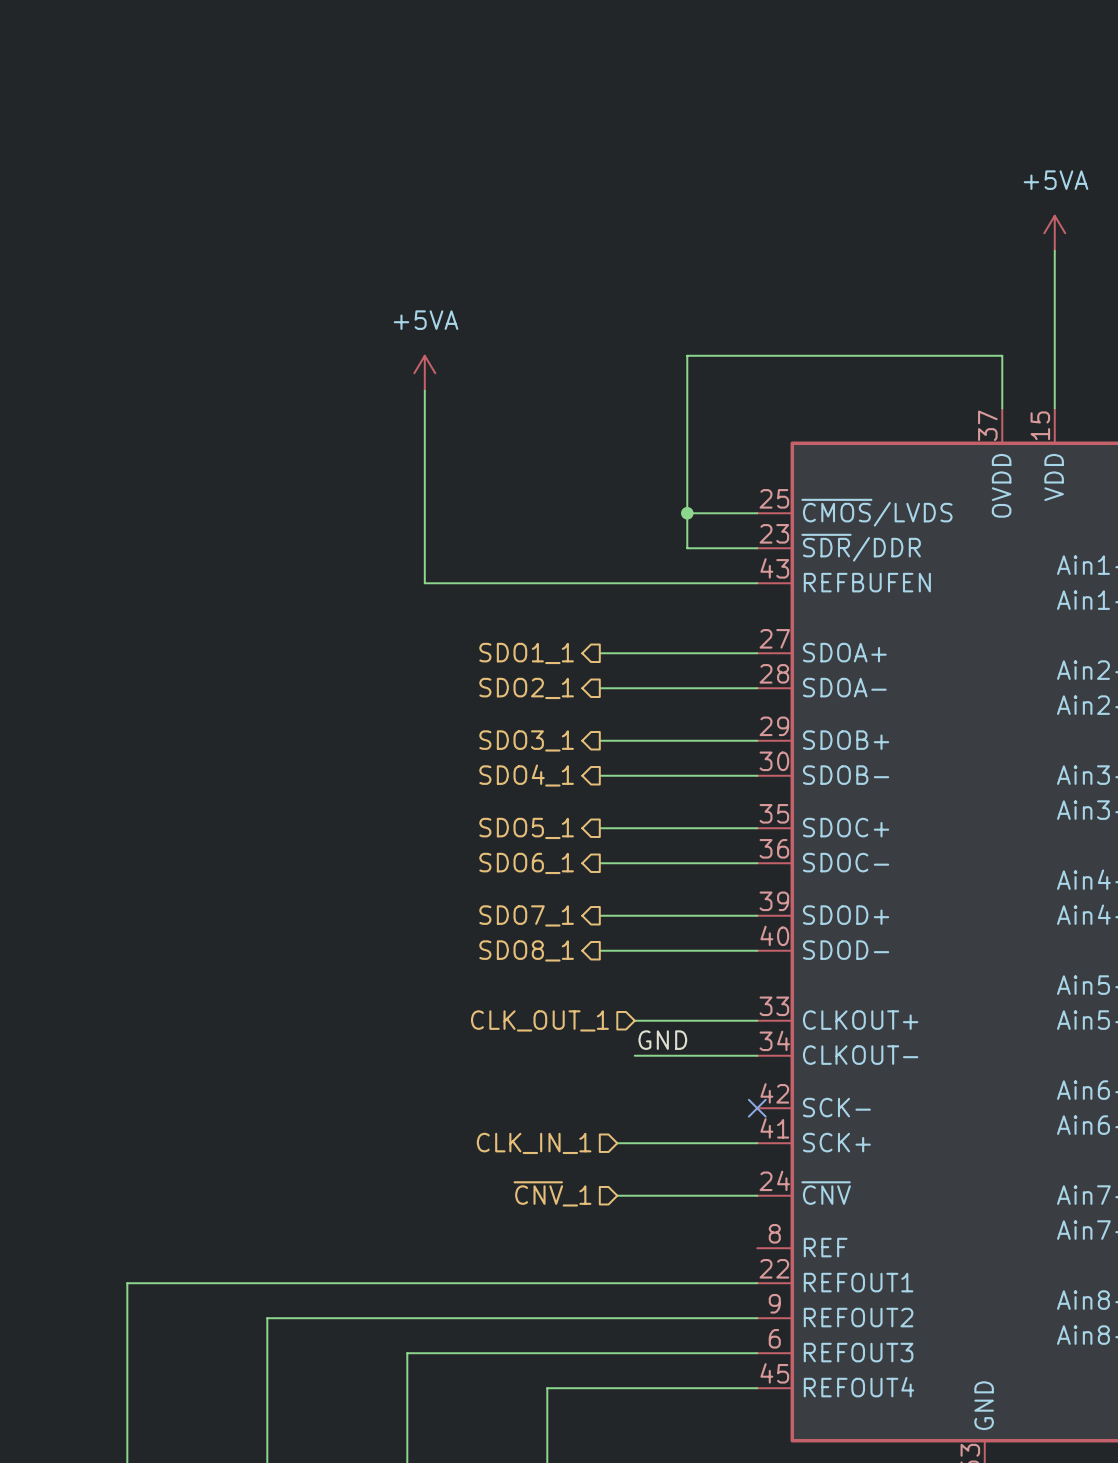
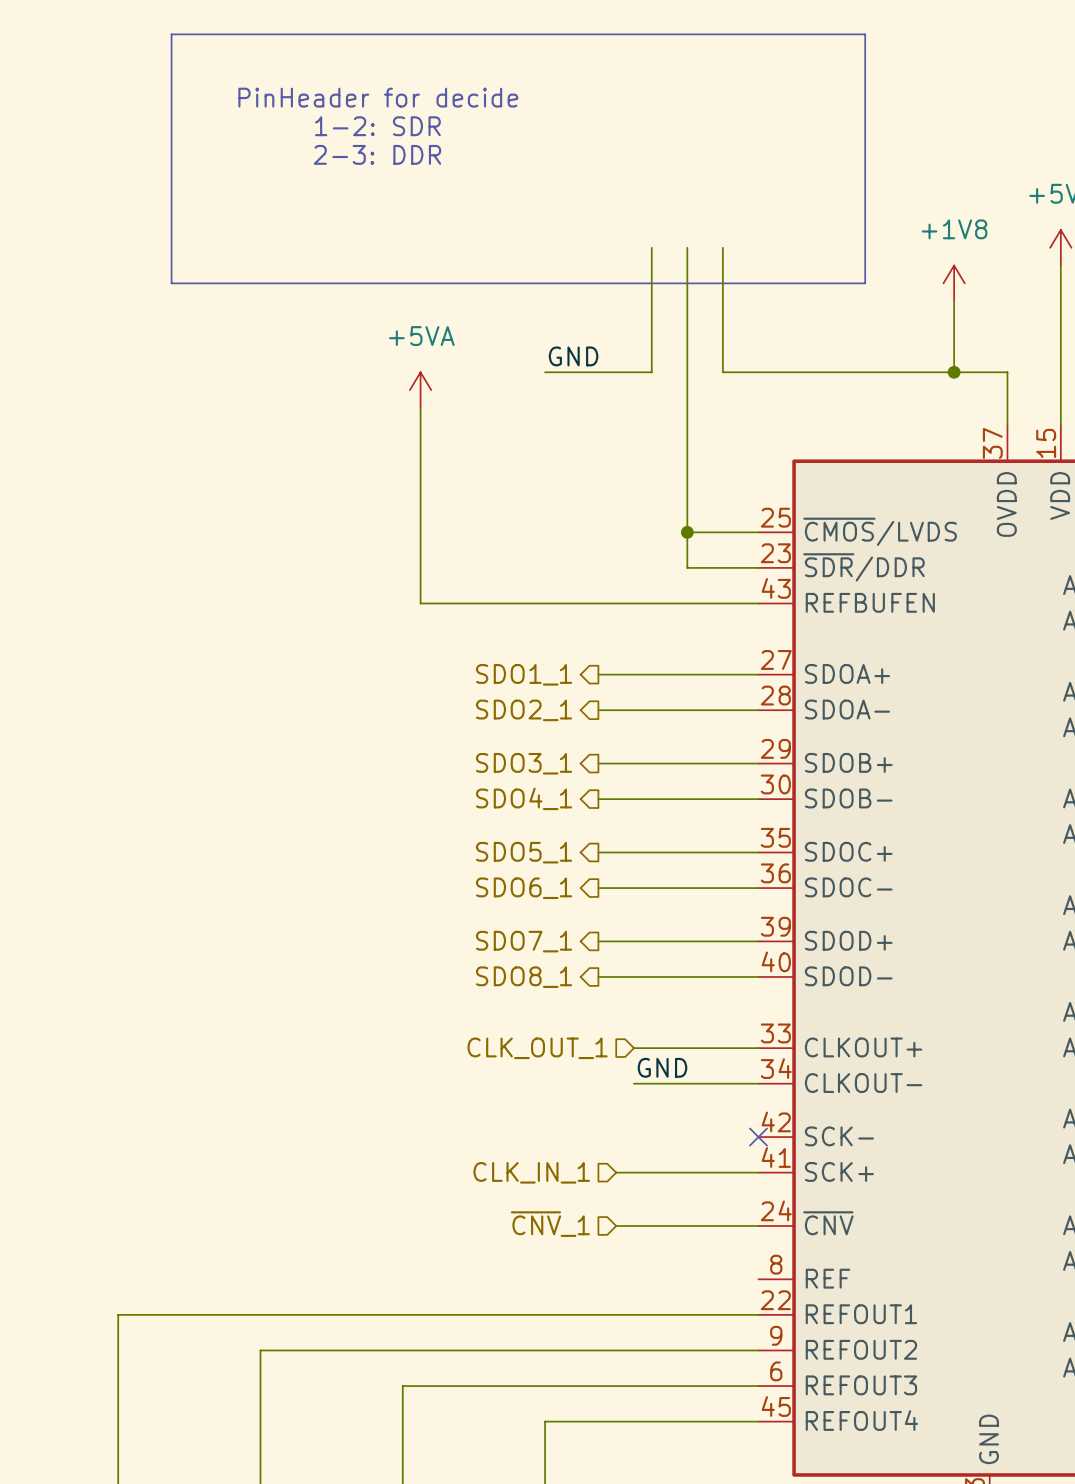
line: none -> (171, 34) (865, 34) (865, 283) (171, 283) (171, 34)
text: none -> PinHeader for decide (378, 97)
text: none -> 1-2: SDR (377, 126)
text: none -> 2-3: DDR (377, 154)
wire: none -> (651, 247) (651, 372) (545, 372)
wire: none -> (722, 247) (722, 372)
power symbol: none -> +1V8 (954, 283)
wire: none -> (954, 301) (954, 372)
label: none -> GND (573, 356)
wire: (687, 355) (722, 355) -> (687, 372) (687, 247)
junction: none -> (954, 372)

